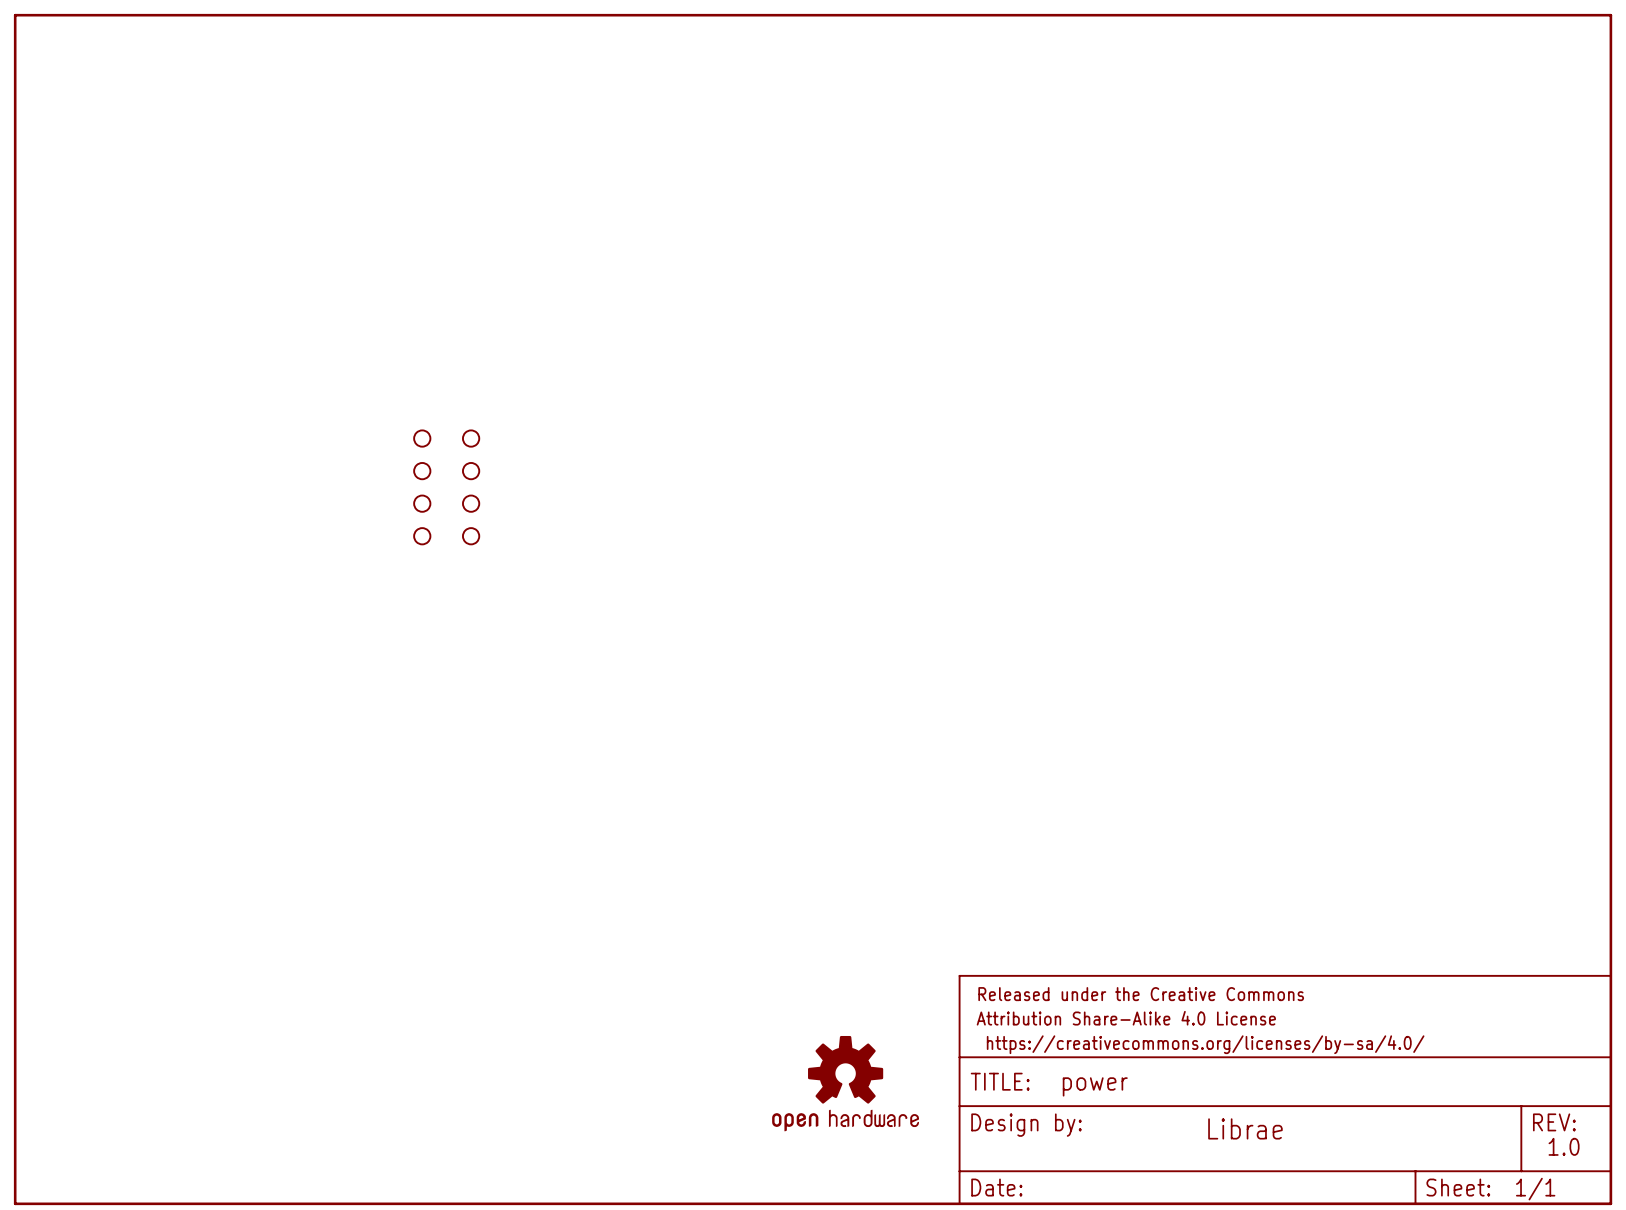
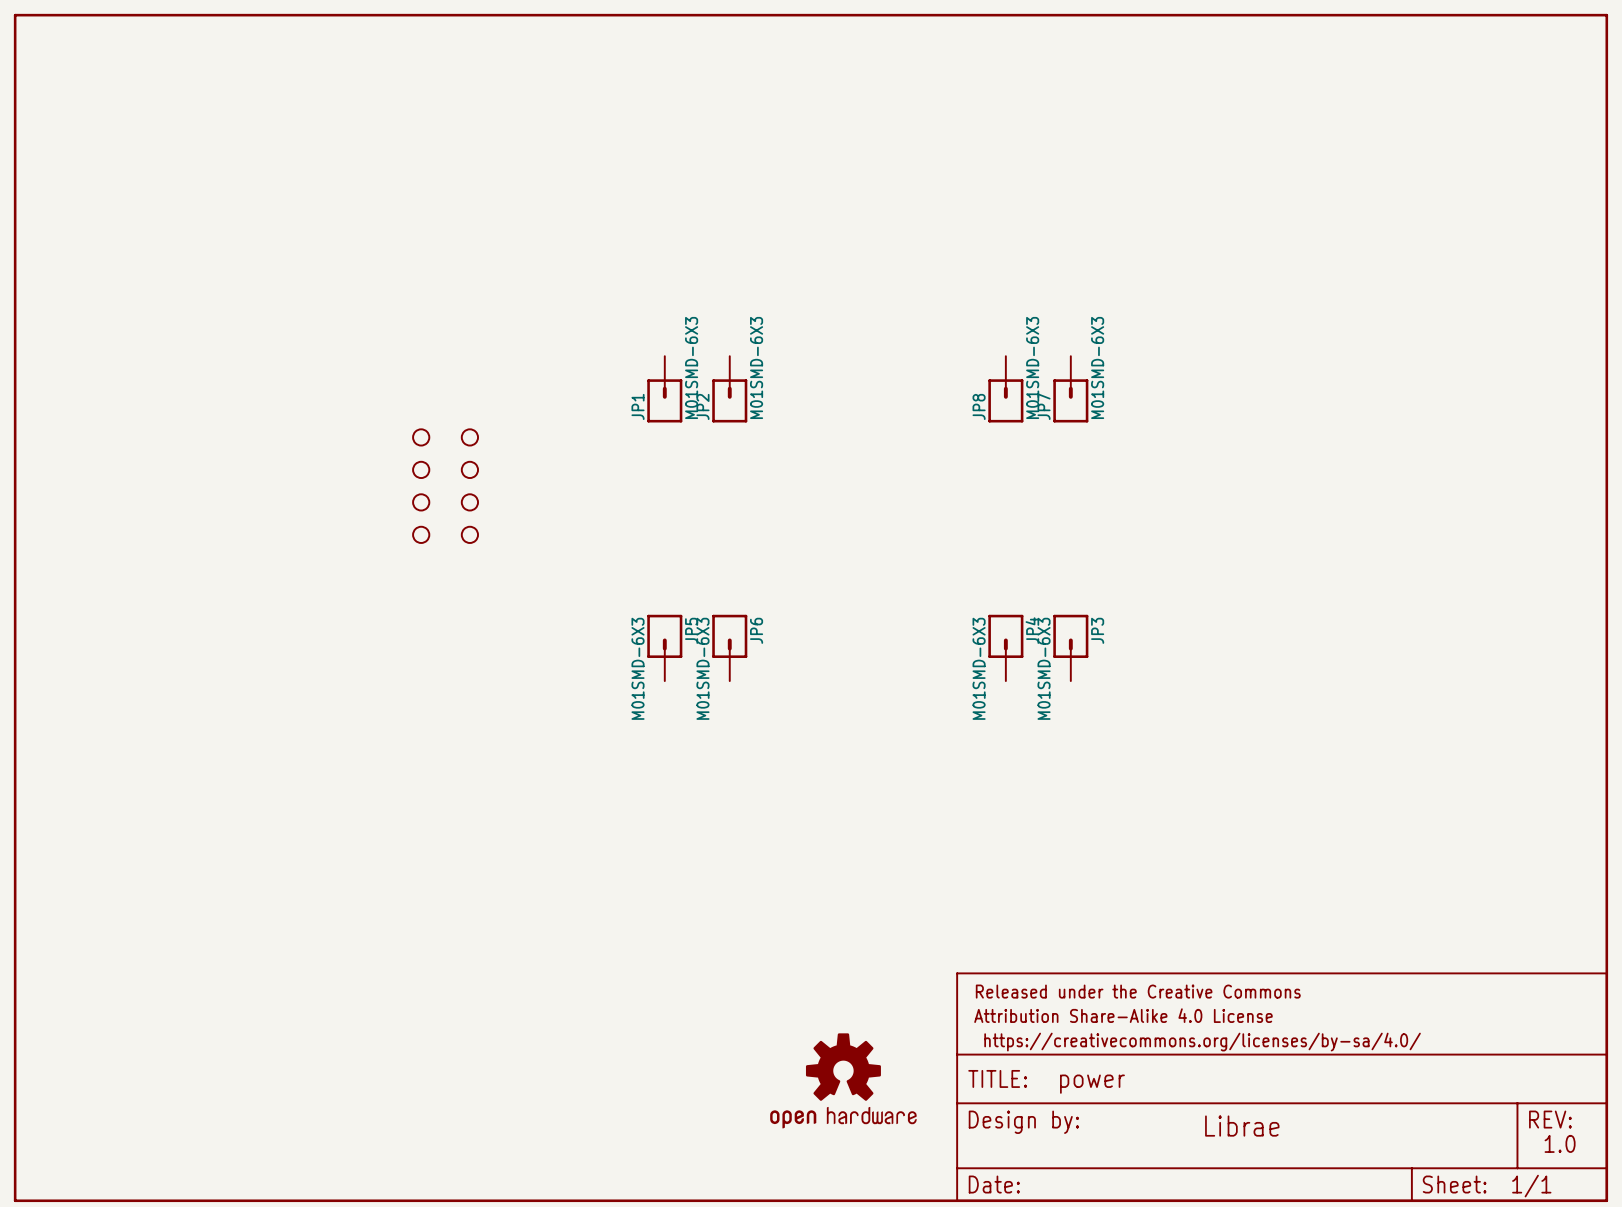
JP1: none -> M01SMD-6X3 (664, 389)
JP2: none -> M01SMD-6X3 (729, 389)
JP8: none -> M01SMD-6X3 (1005, 389)
JP7: none -> M01SMD-6X3 (1070, 389)
JP5: none -> M01SMD-6X3 (664, 647)
JP6: none -> M01SMD-6X3 (729, 647)
JP4: none -> M01SMD-6X3 (1005, 647)
JP3: none -> M01SMD-6X3 (1070, 647)

